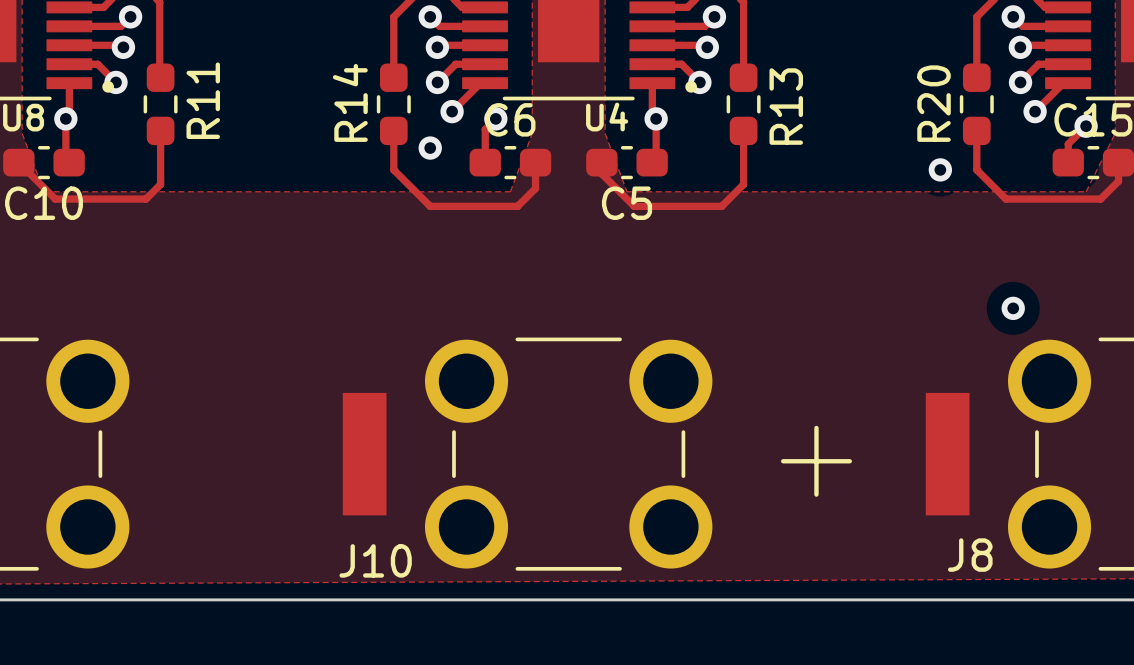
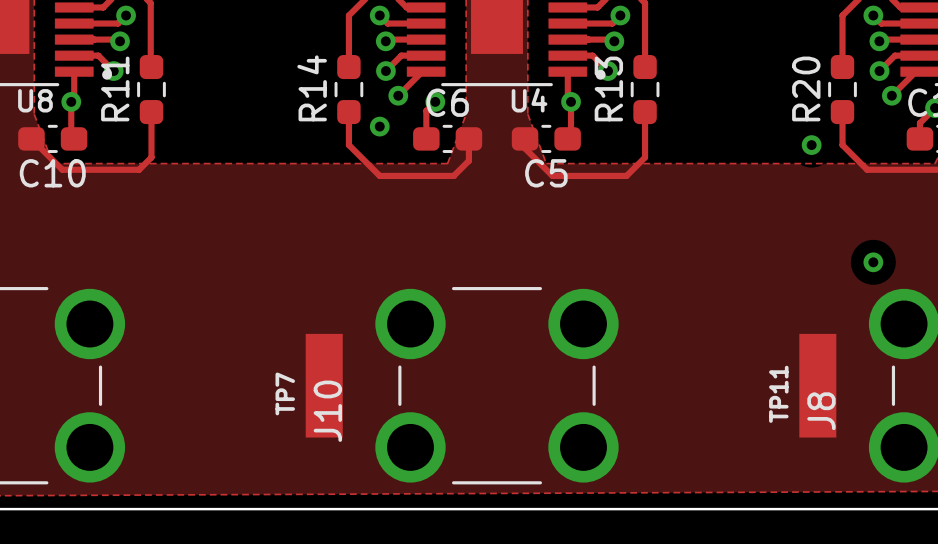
R11 name position: R11 (203, 100) -> R11 (115, 88)
R13 name position: R13 (786, 106) -> R13 (608, 88)
text: + (816, 461) -> none
TP7 name: none -> TP7 (285, 393)
TP11 name: none -> TP11 (778, 394)
J8 name rotation: 0° (970, 555) -> 90° counterclockwise (821, 411)
J8 name position: J8 (970, 555) -> J8 (821, 411)
J10 name rotation: 0° (375, 560) -> 90° counterclockwise (327, 411)

